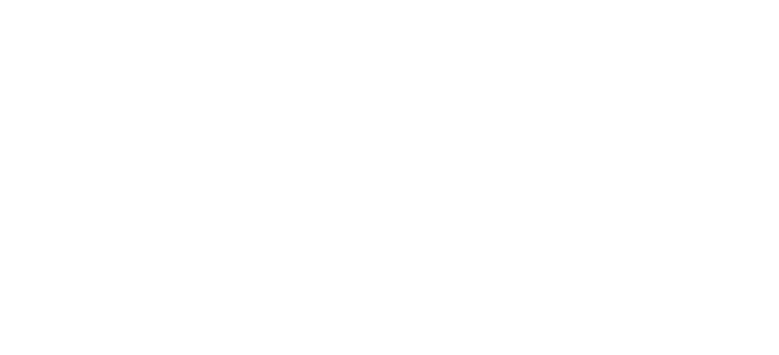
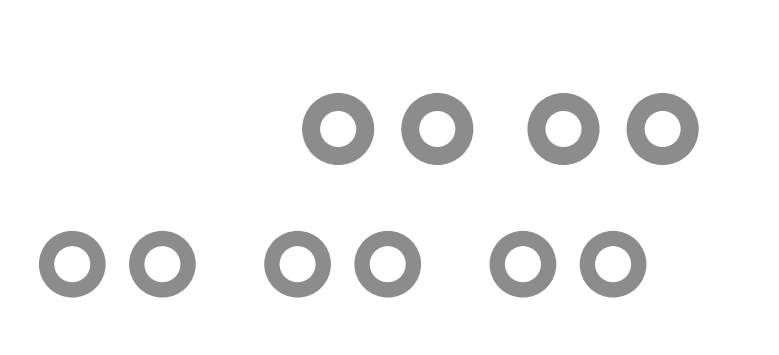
part: none -> (387, 128)
part: none -> (613, 128)
part: none -> (117, 264)
part: none -> (342, 264)
part: none -> (568, 264)

